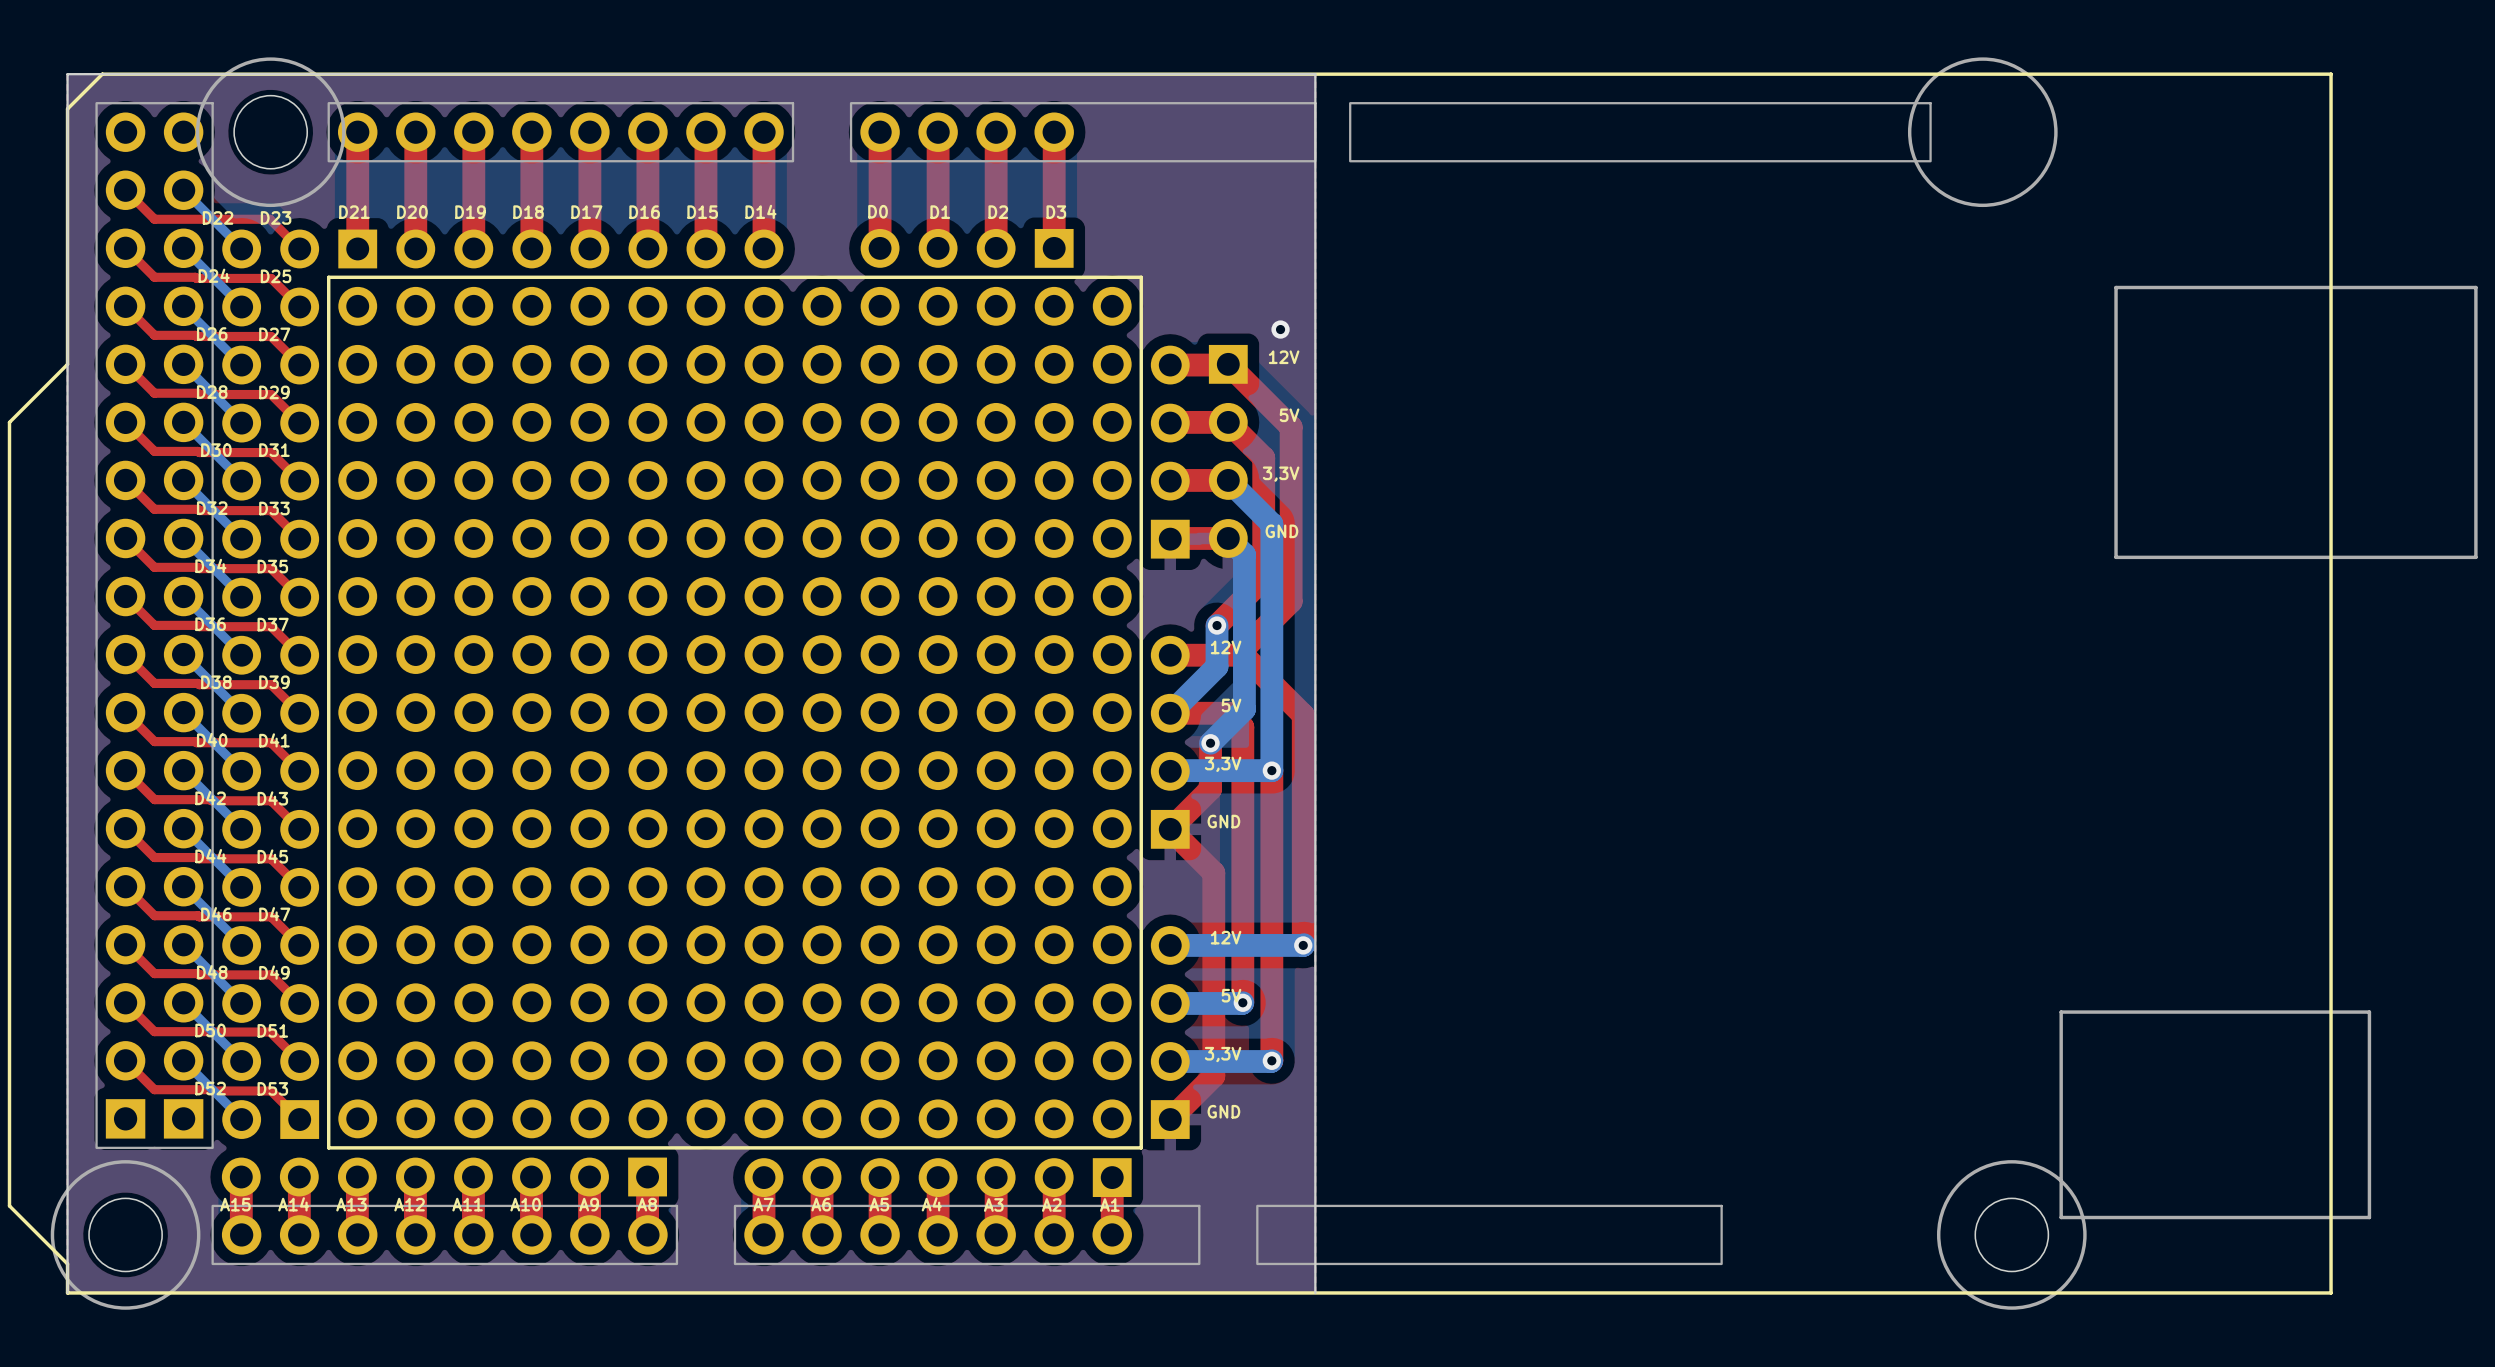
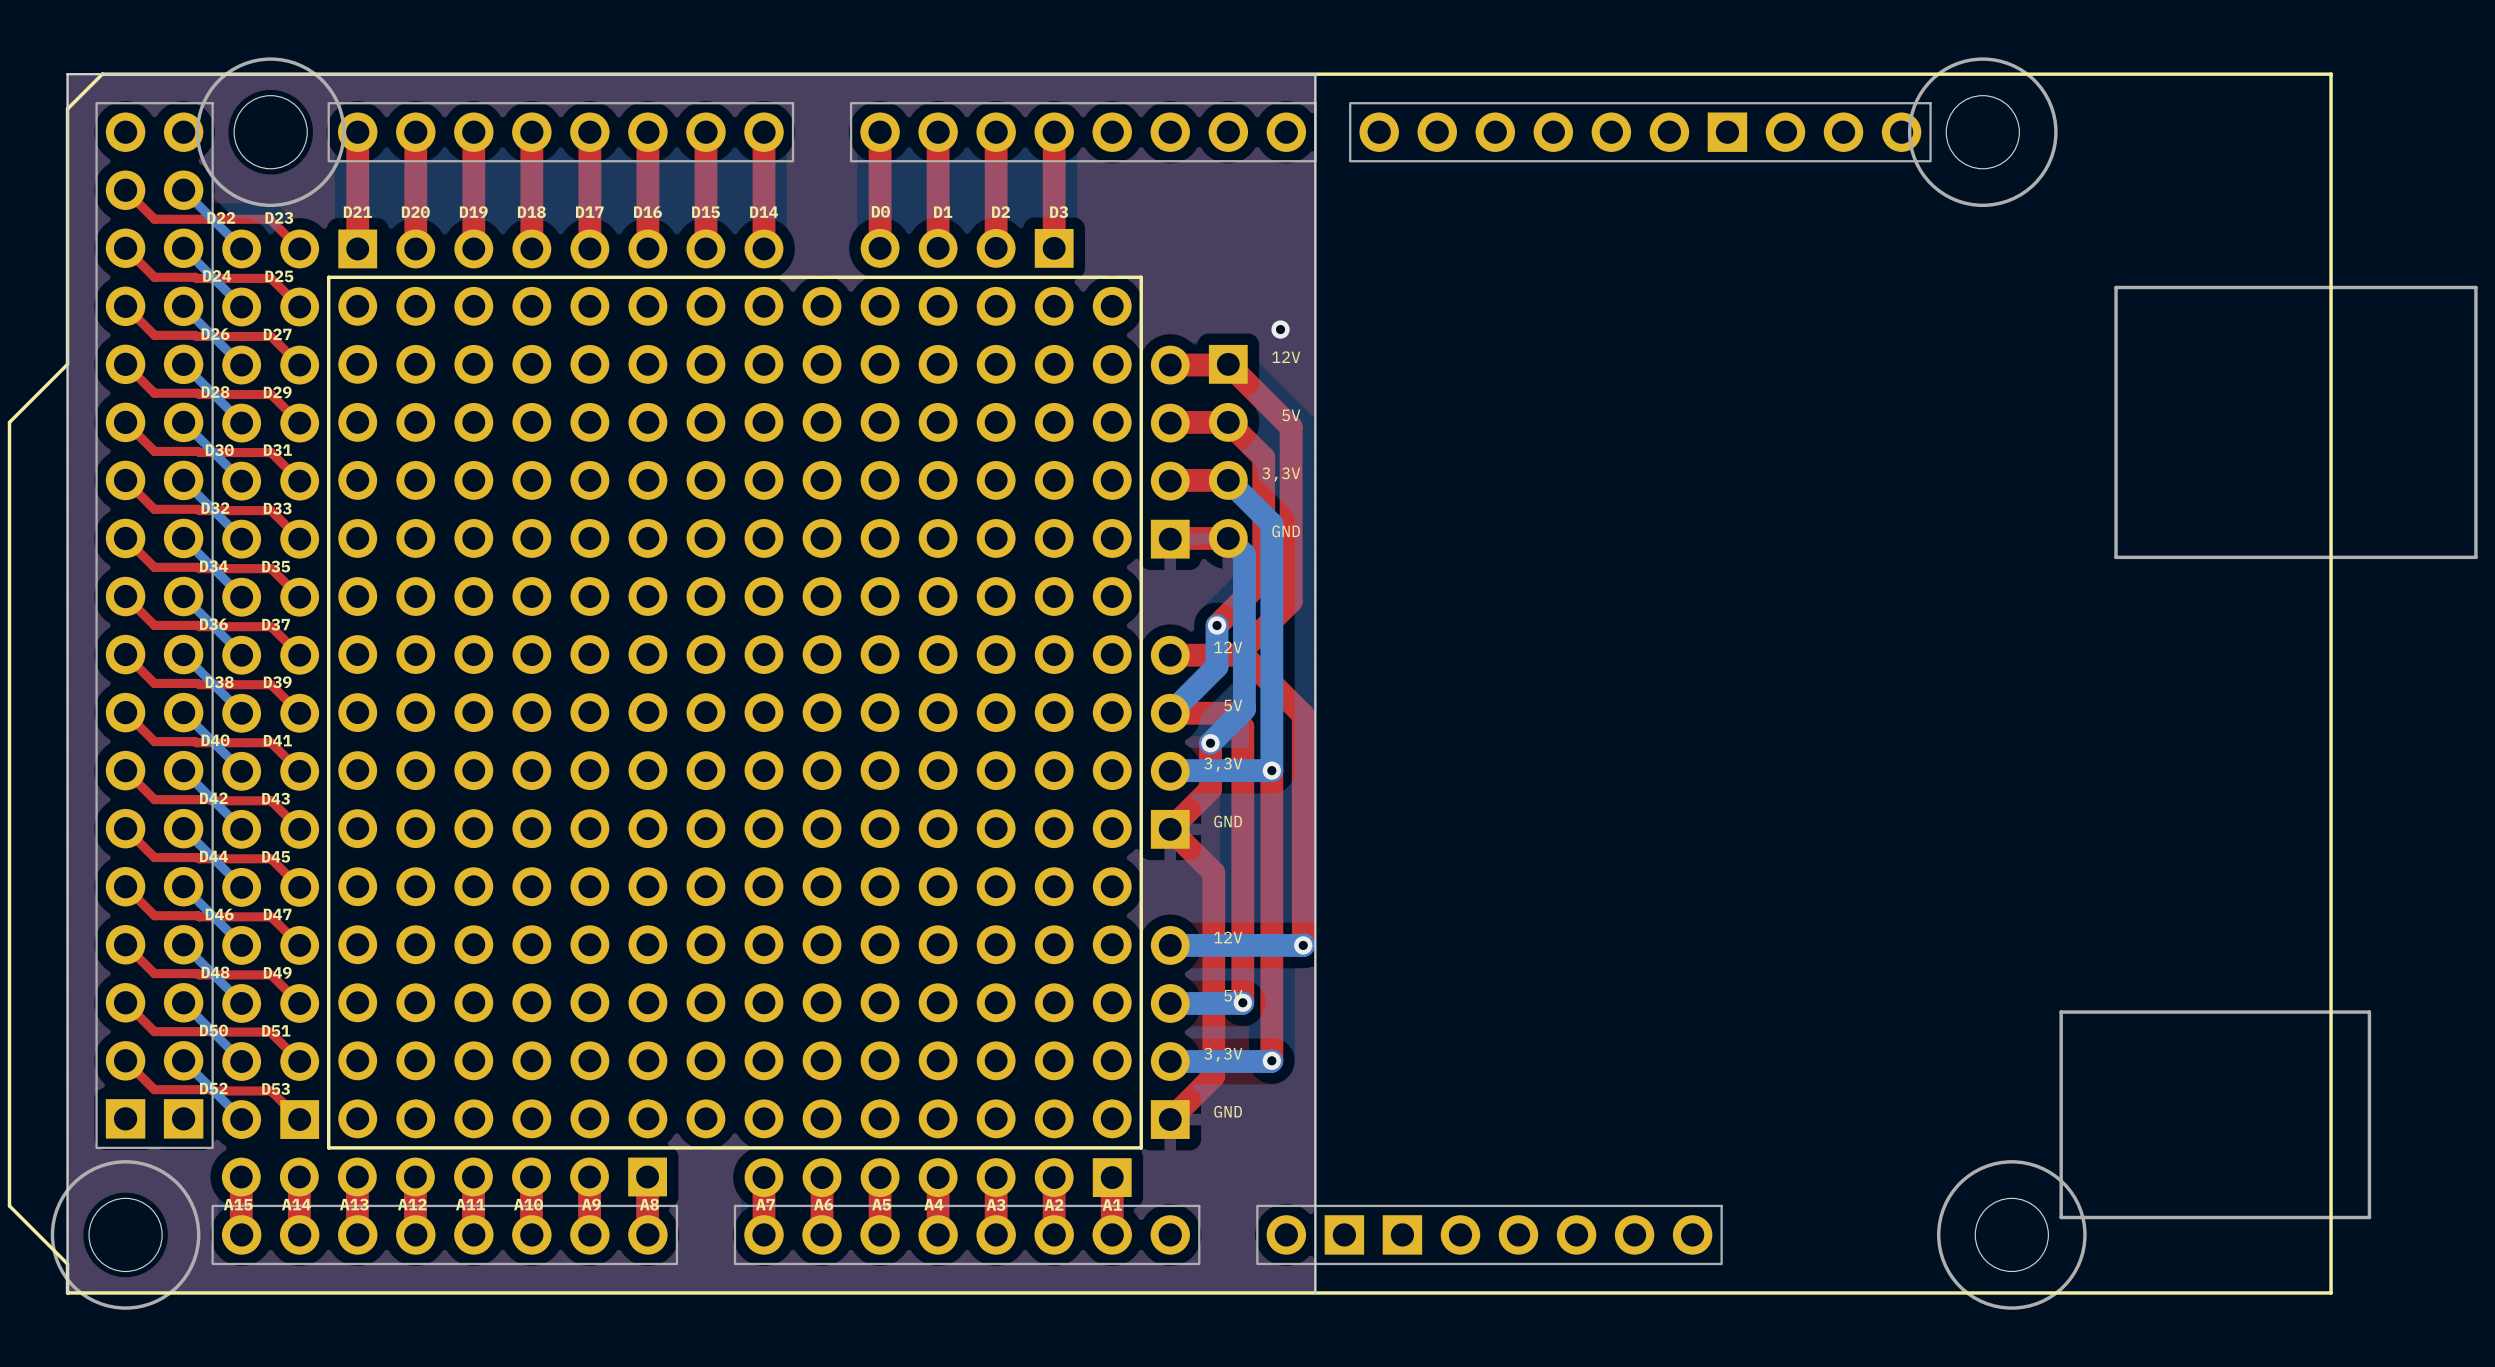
part footprint: [7, 57, 2478, 1310] -> [7, 57, 2478, 1310]

